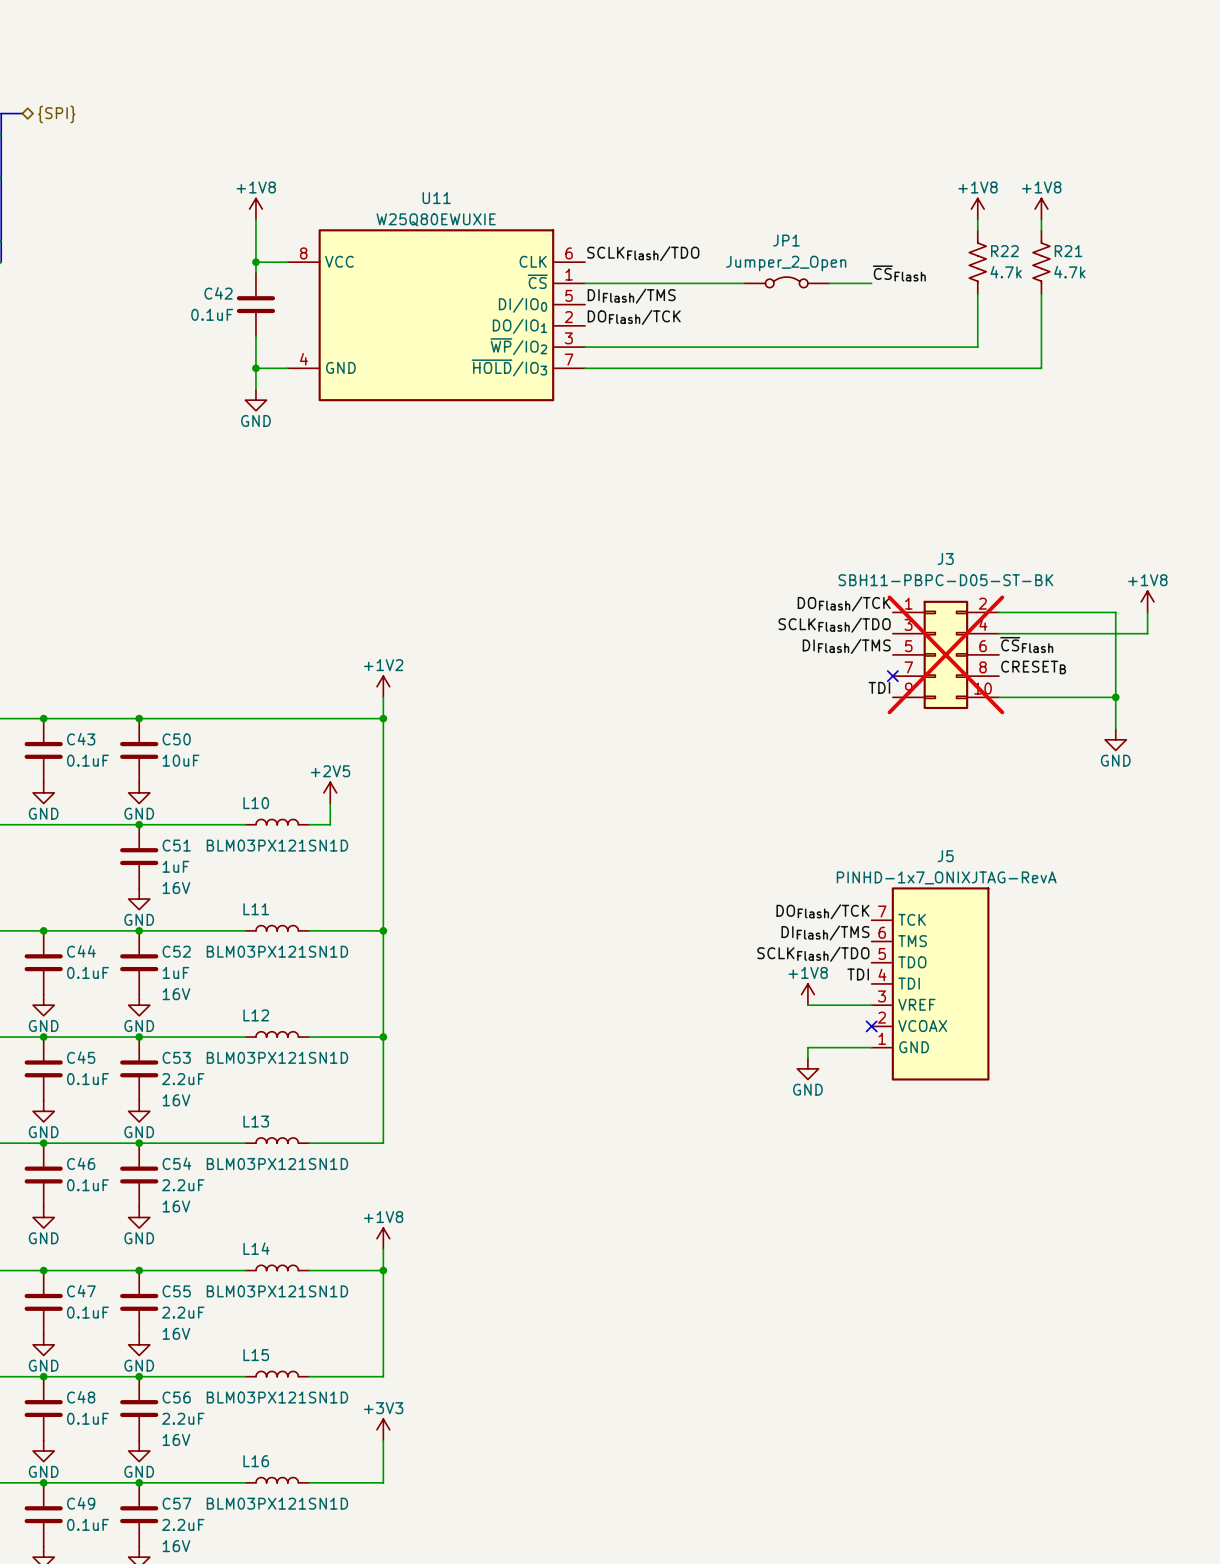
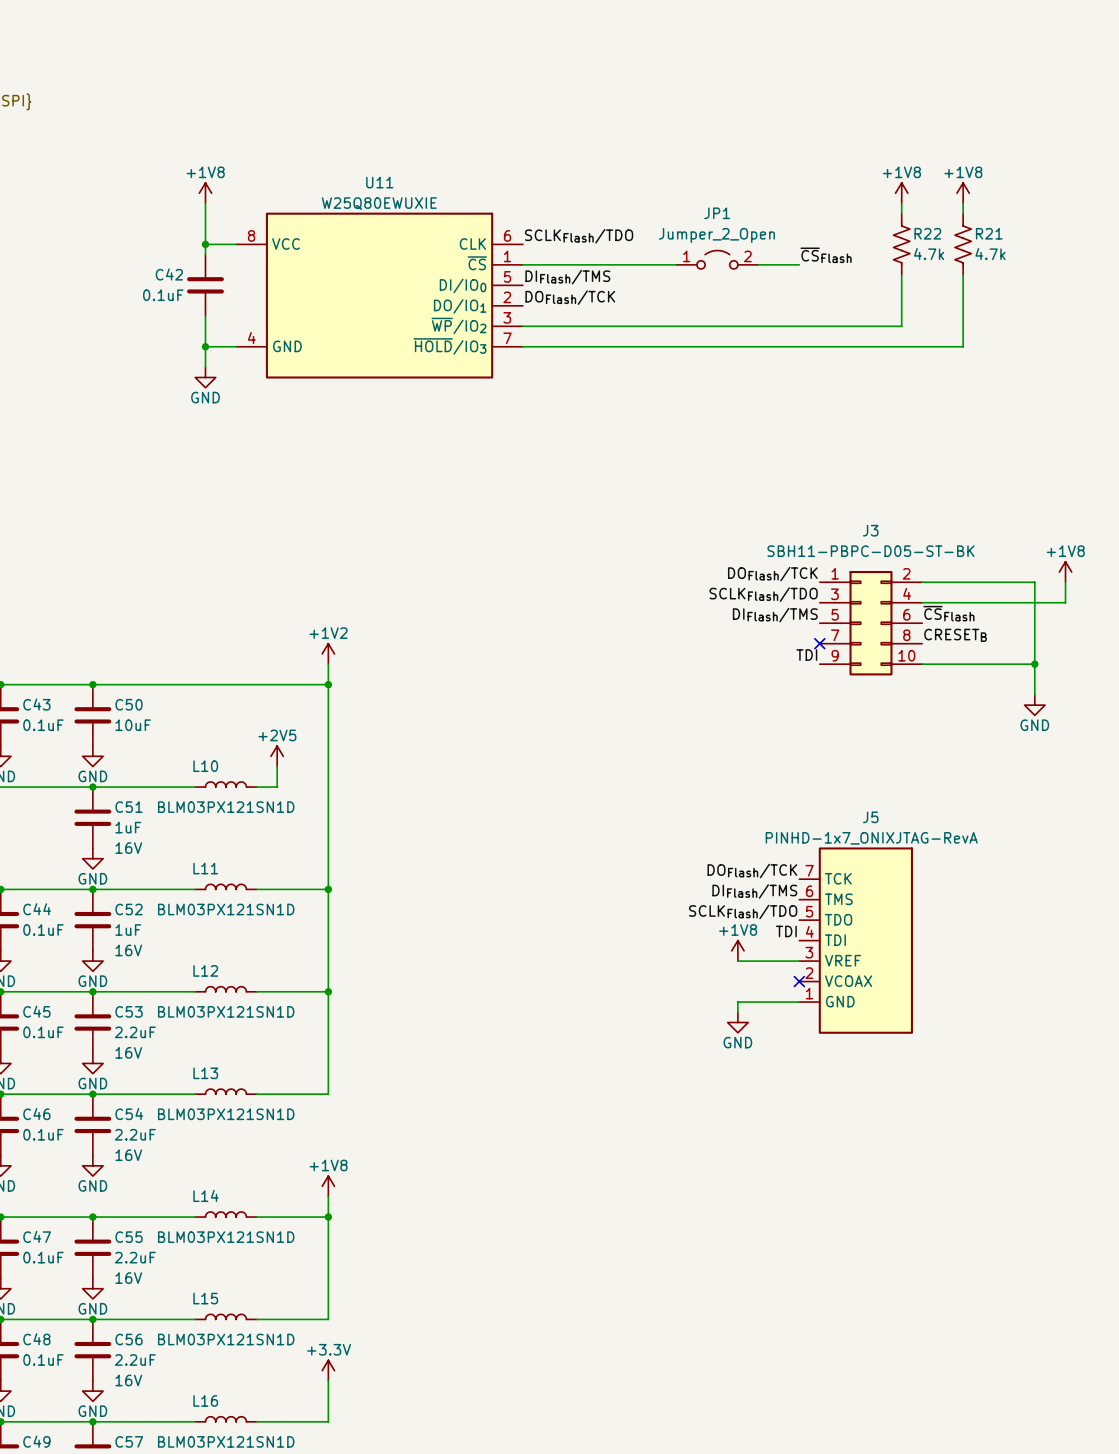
JP1 symbol: [744, 277, 830, 288] -> [676, 250, 759, 269]
J3 do-not-place cross: (945, 654) -> none
power symbol: +3V3 (383, 1429) -> +3.3V (328, 1370)

